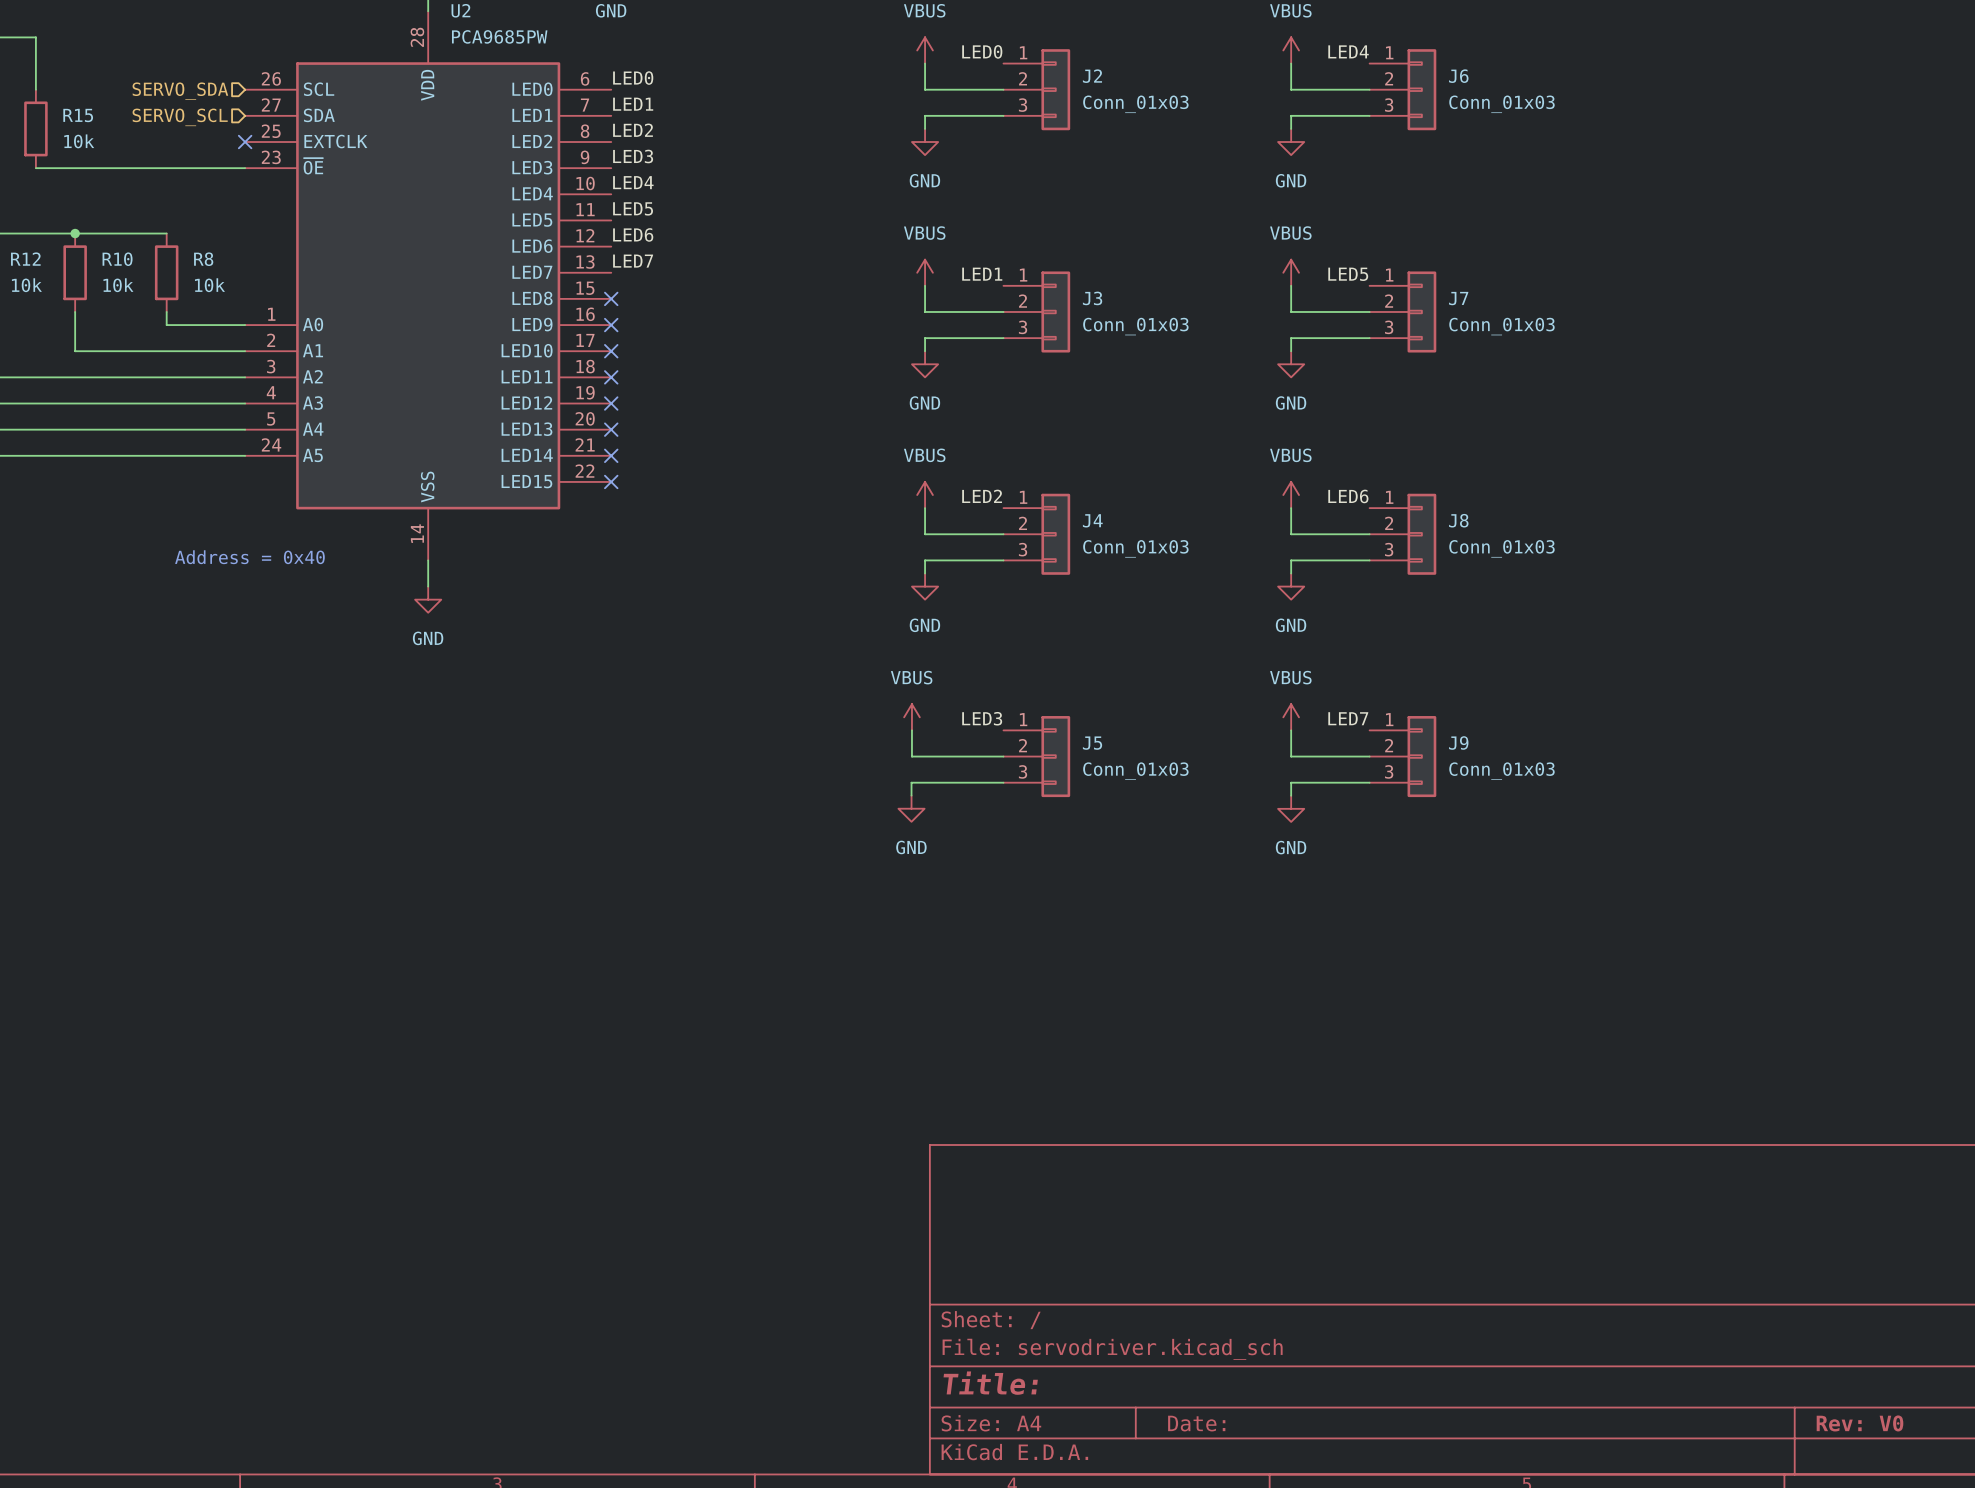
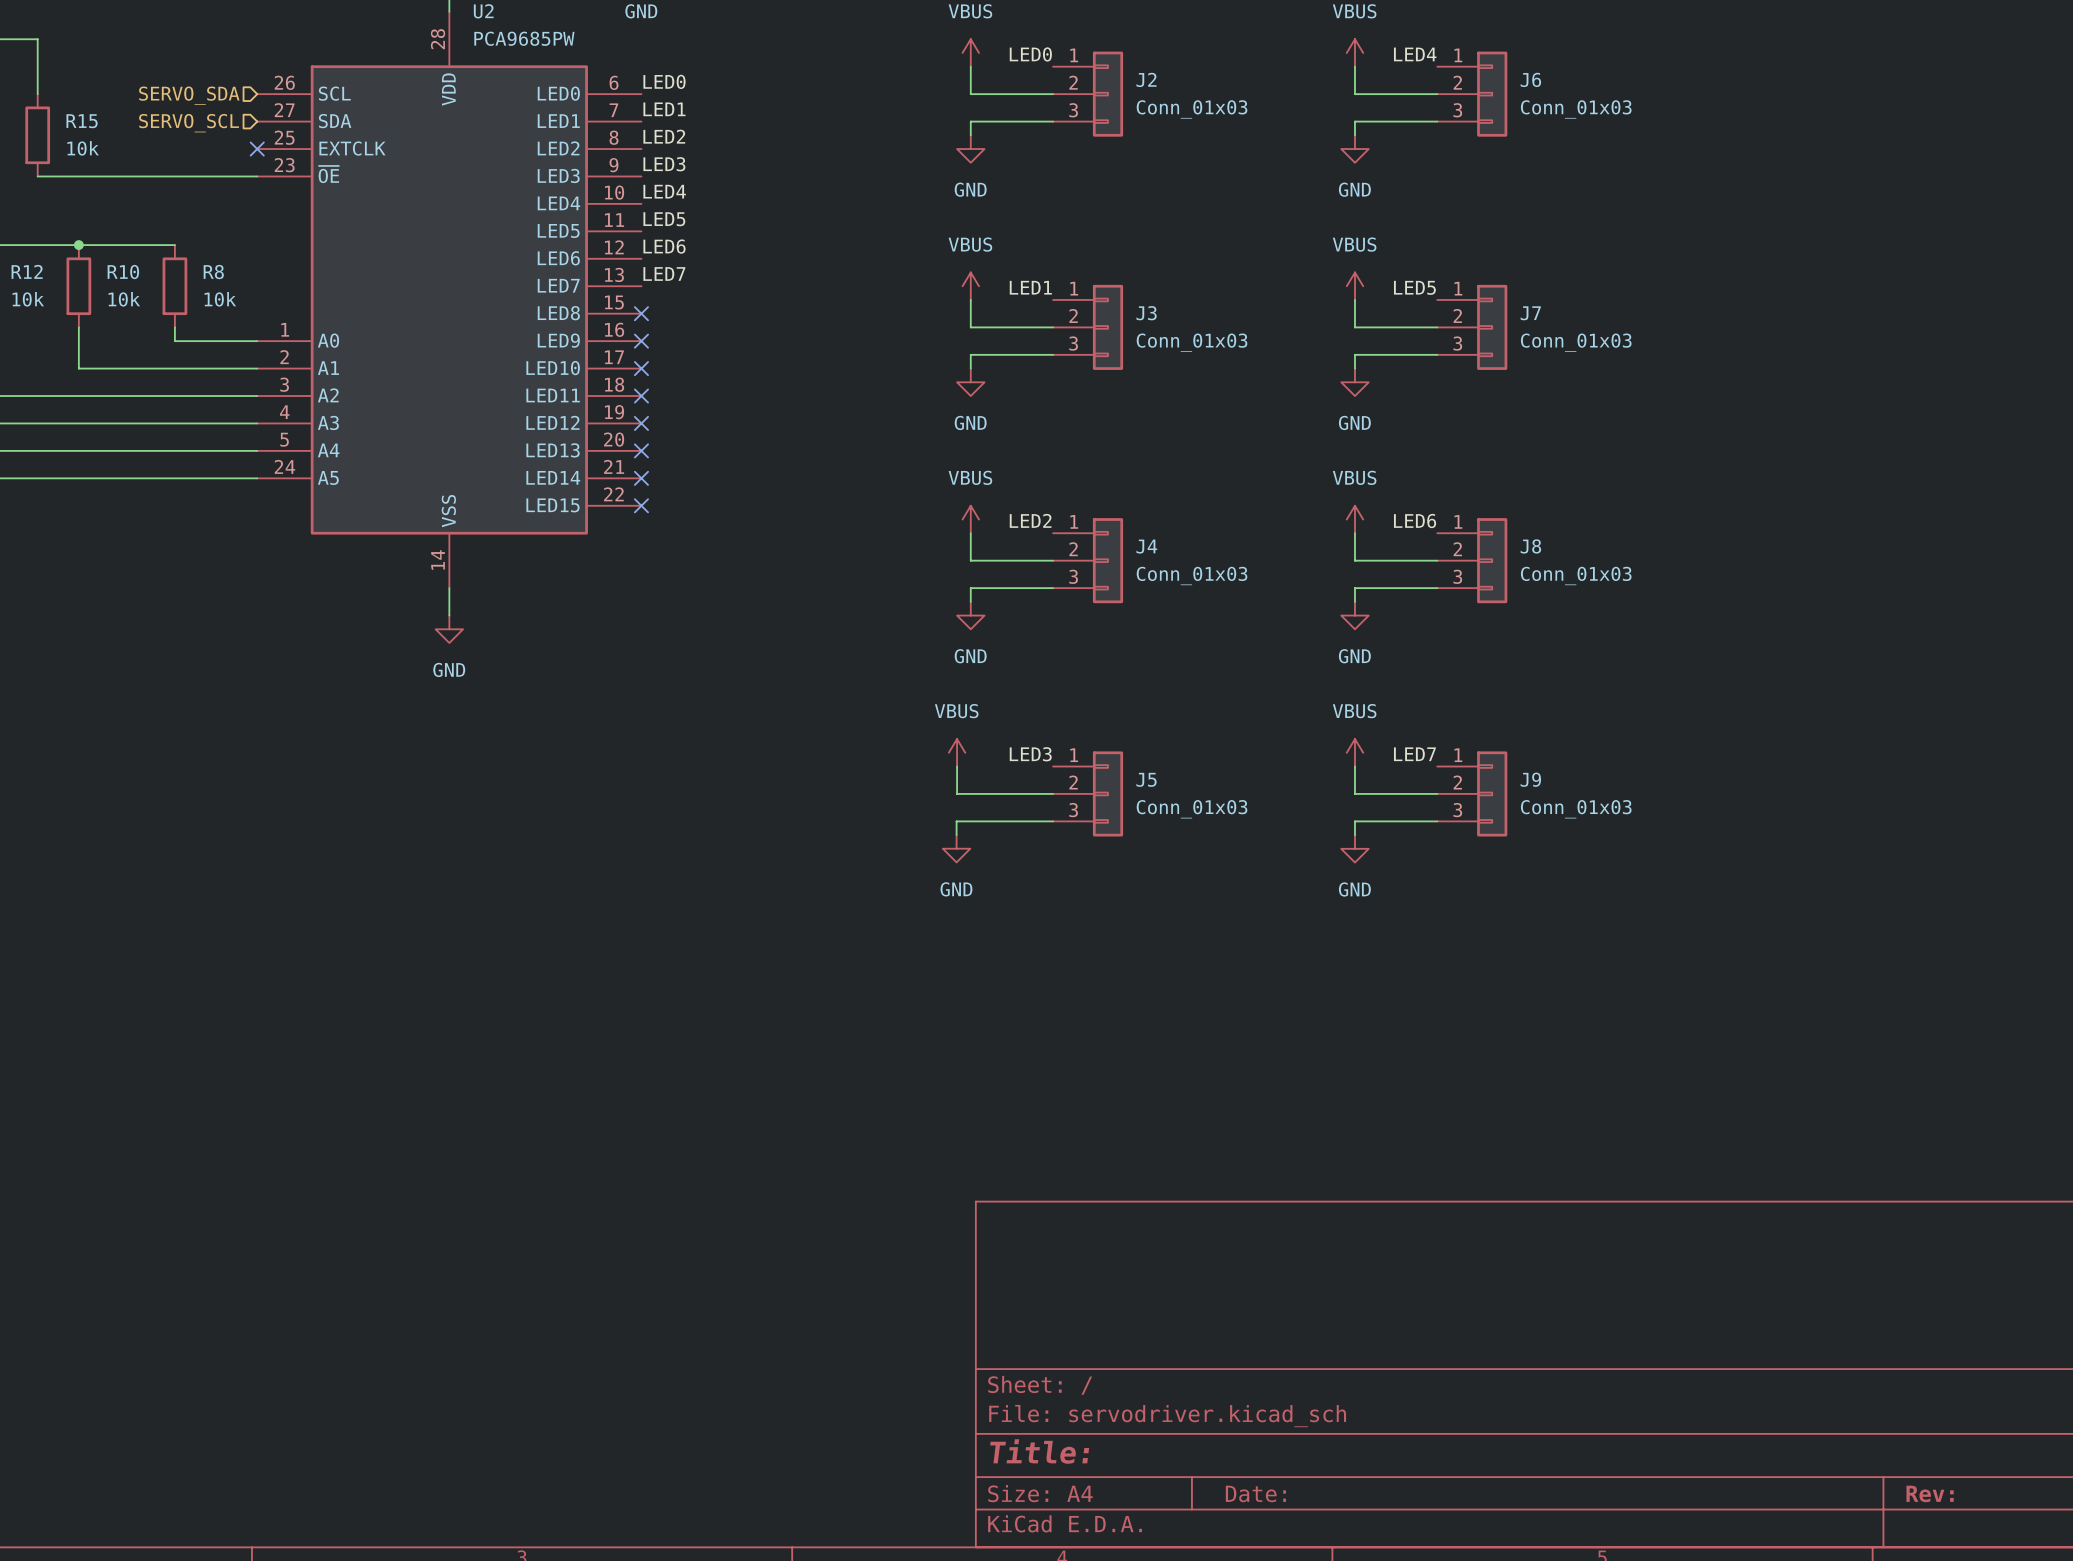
text: Address = 0x40 (249, 557) -> none
title block: Rev: V0 (1859, 1423) -> Rev: (1930, 1493)

